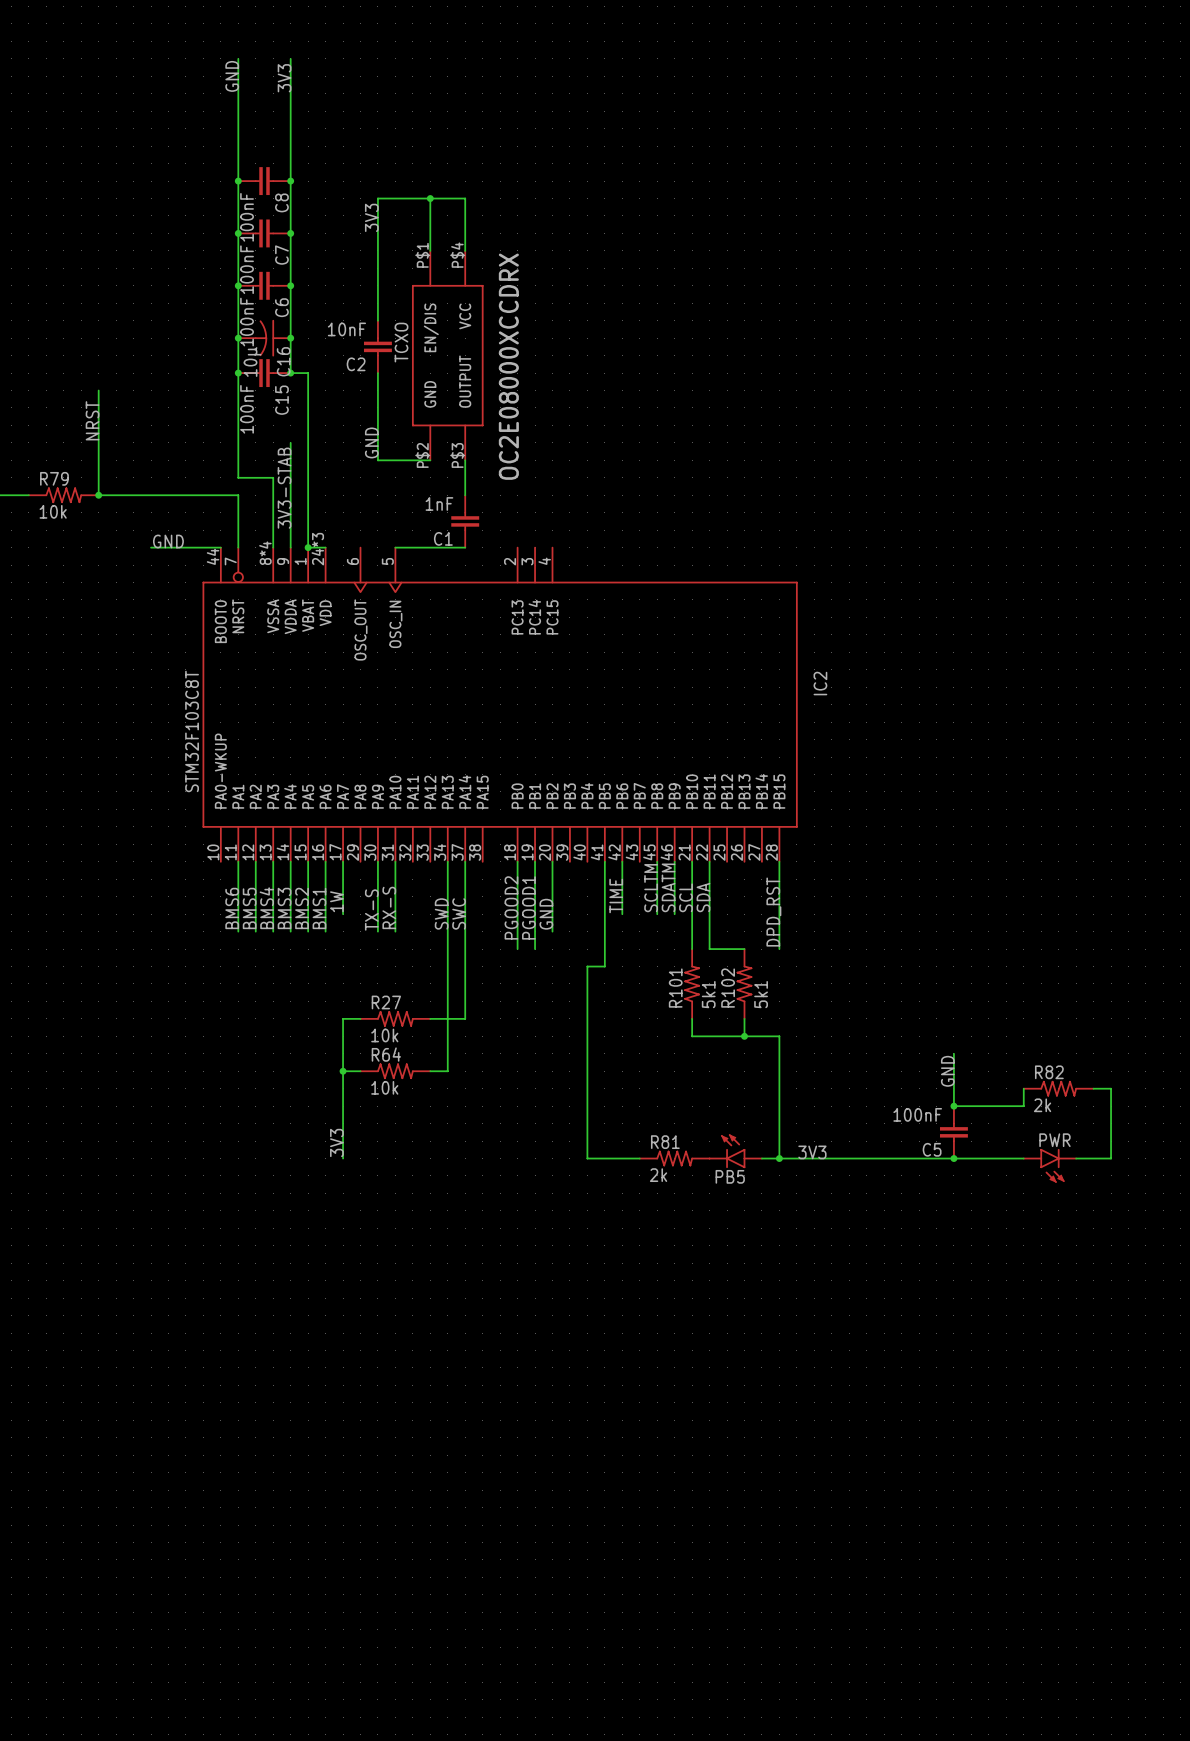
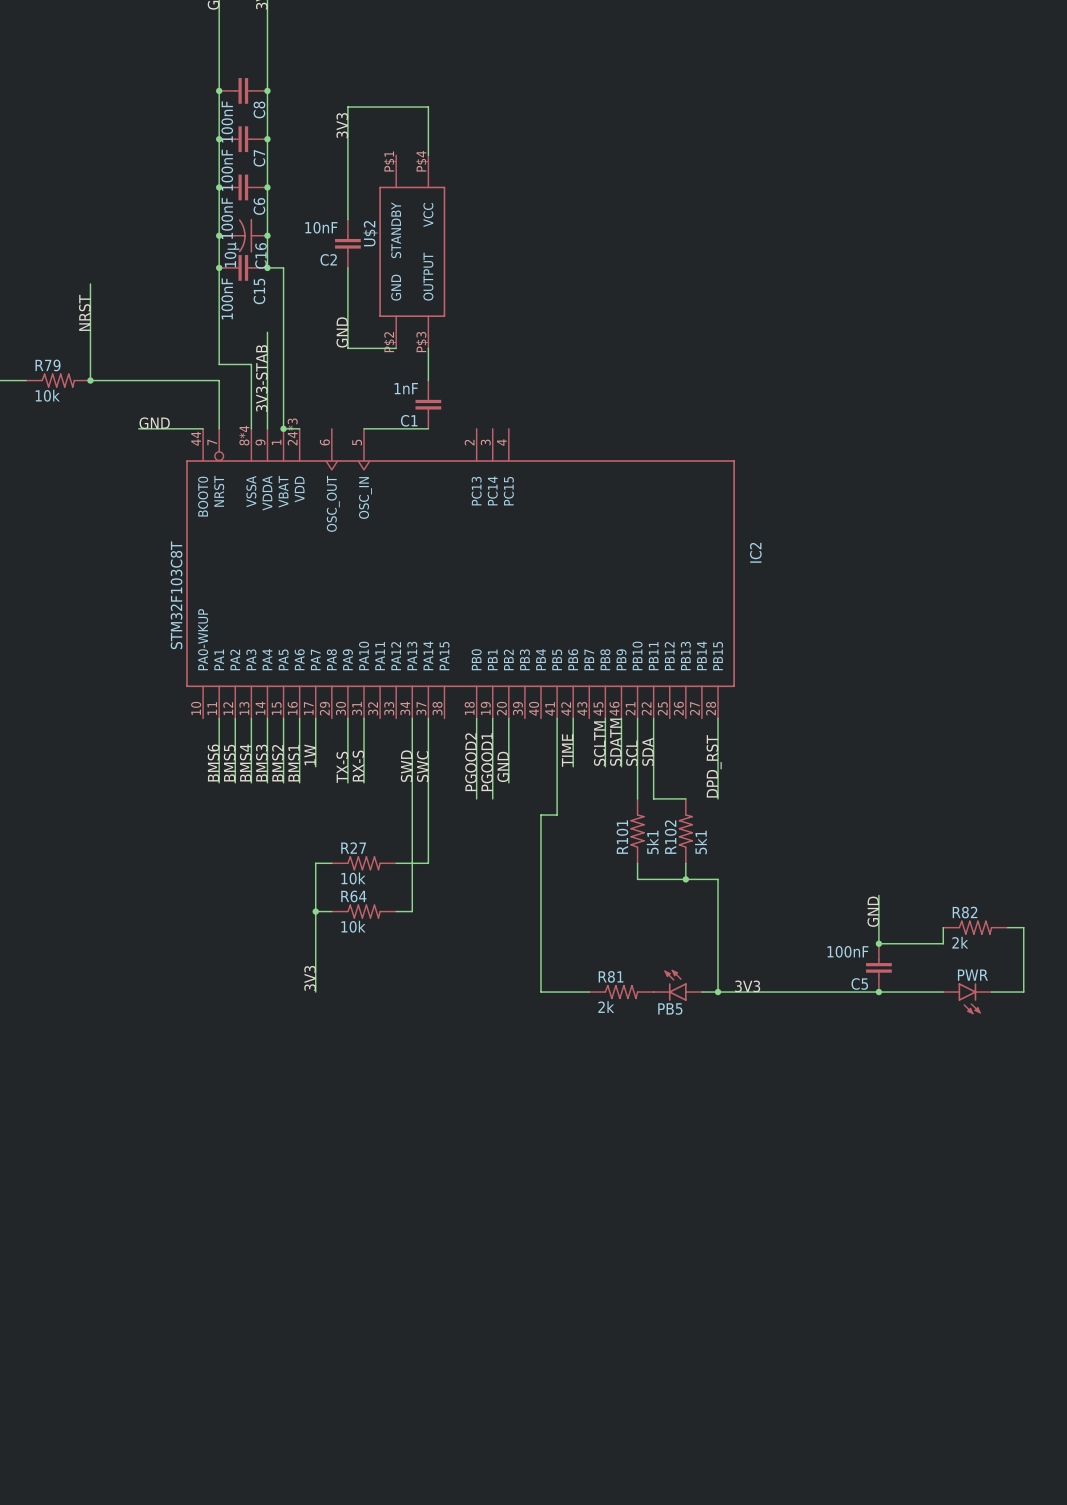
wire: (430, 198) (430, 250) -> none
junction: (430, 198) -> none
TCXO pin name: EN/DIS (431, 327) -> STANDBY (396, 230)
TCXO name: TCXO (401, 342) -> U$2 (370, 233)
TCXO text: OC2E08000XCCDRX (508, 366) -> none

